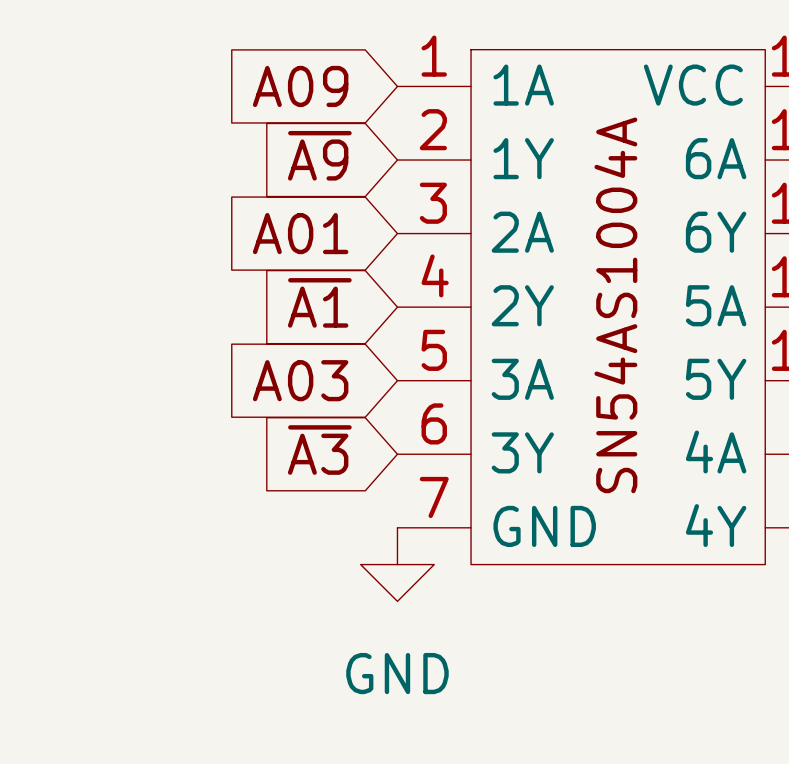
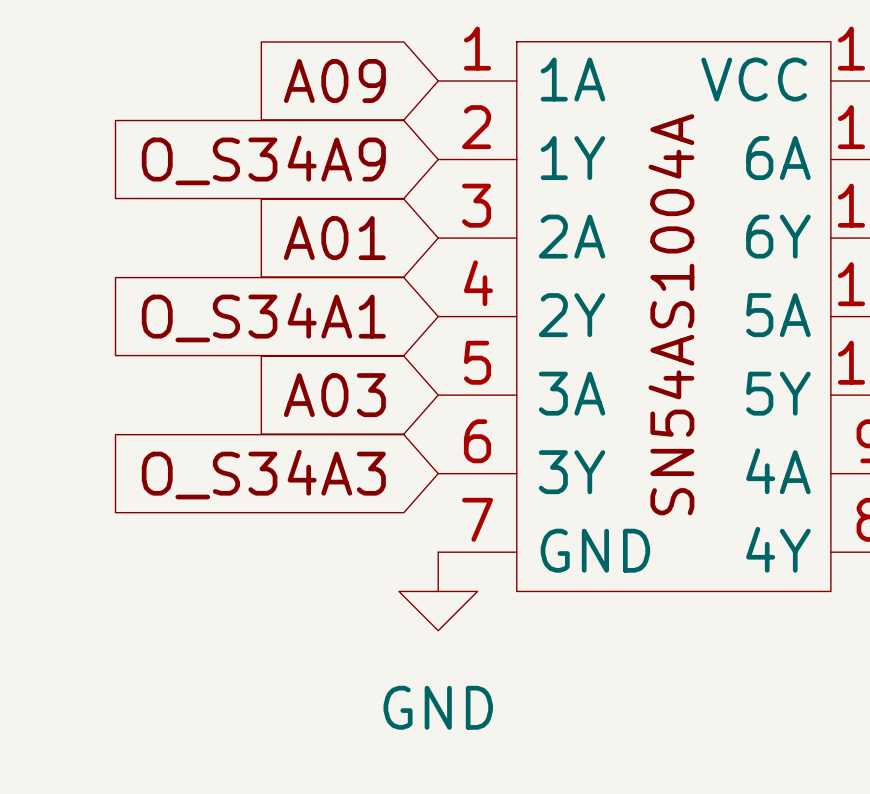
global label: ~{A9} (319, 155) -> O_S34A9 (263, 160)
global label: ~{A1} (319, 302) -> O_S34A1 (263, 317)
global label: ~{A3} (319, 450) -> O_S34A3 (263, 474)

